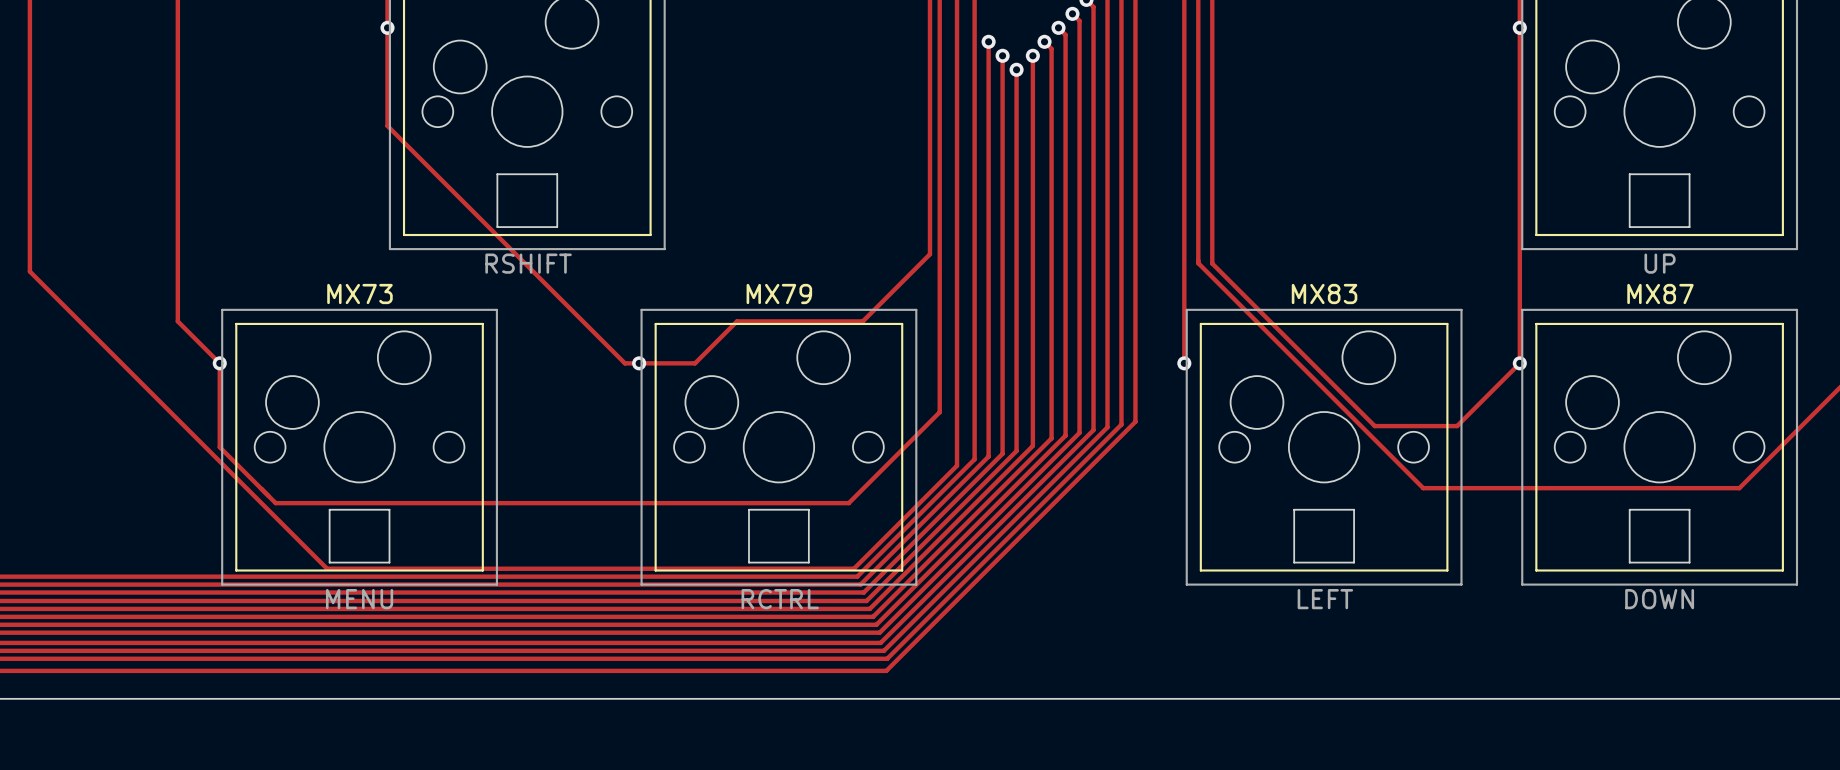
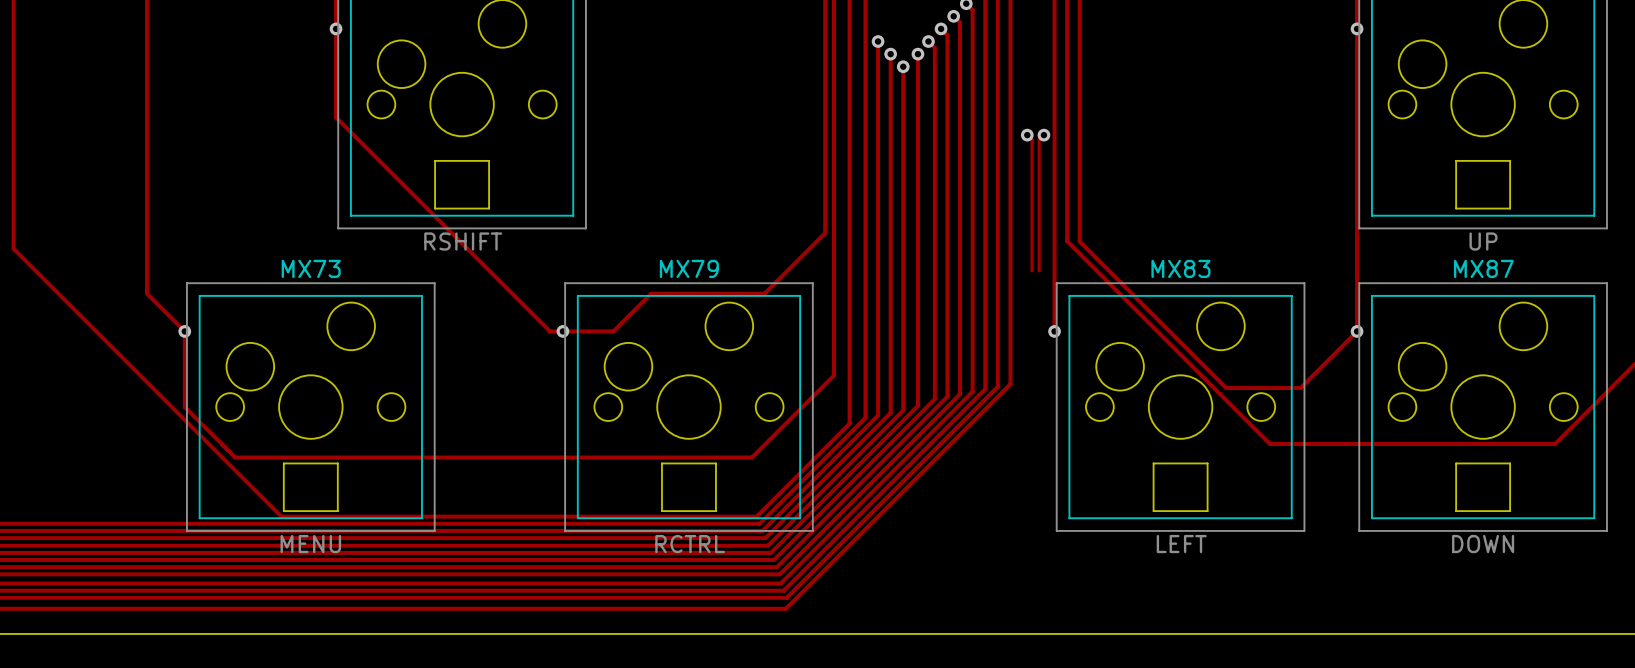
track: none -> (1027, 135) (1032, 139) (1032, 270)
via: none -> (1027, 135)
track: none -> (1043, 135) (1039, 139) (1039, 270)
via: none -> (1043, 135)

